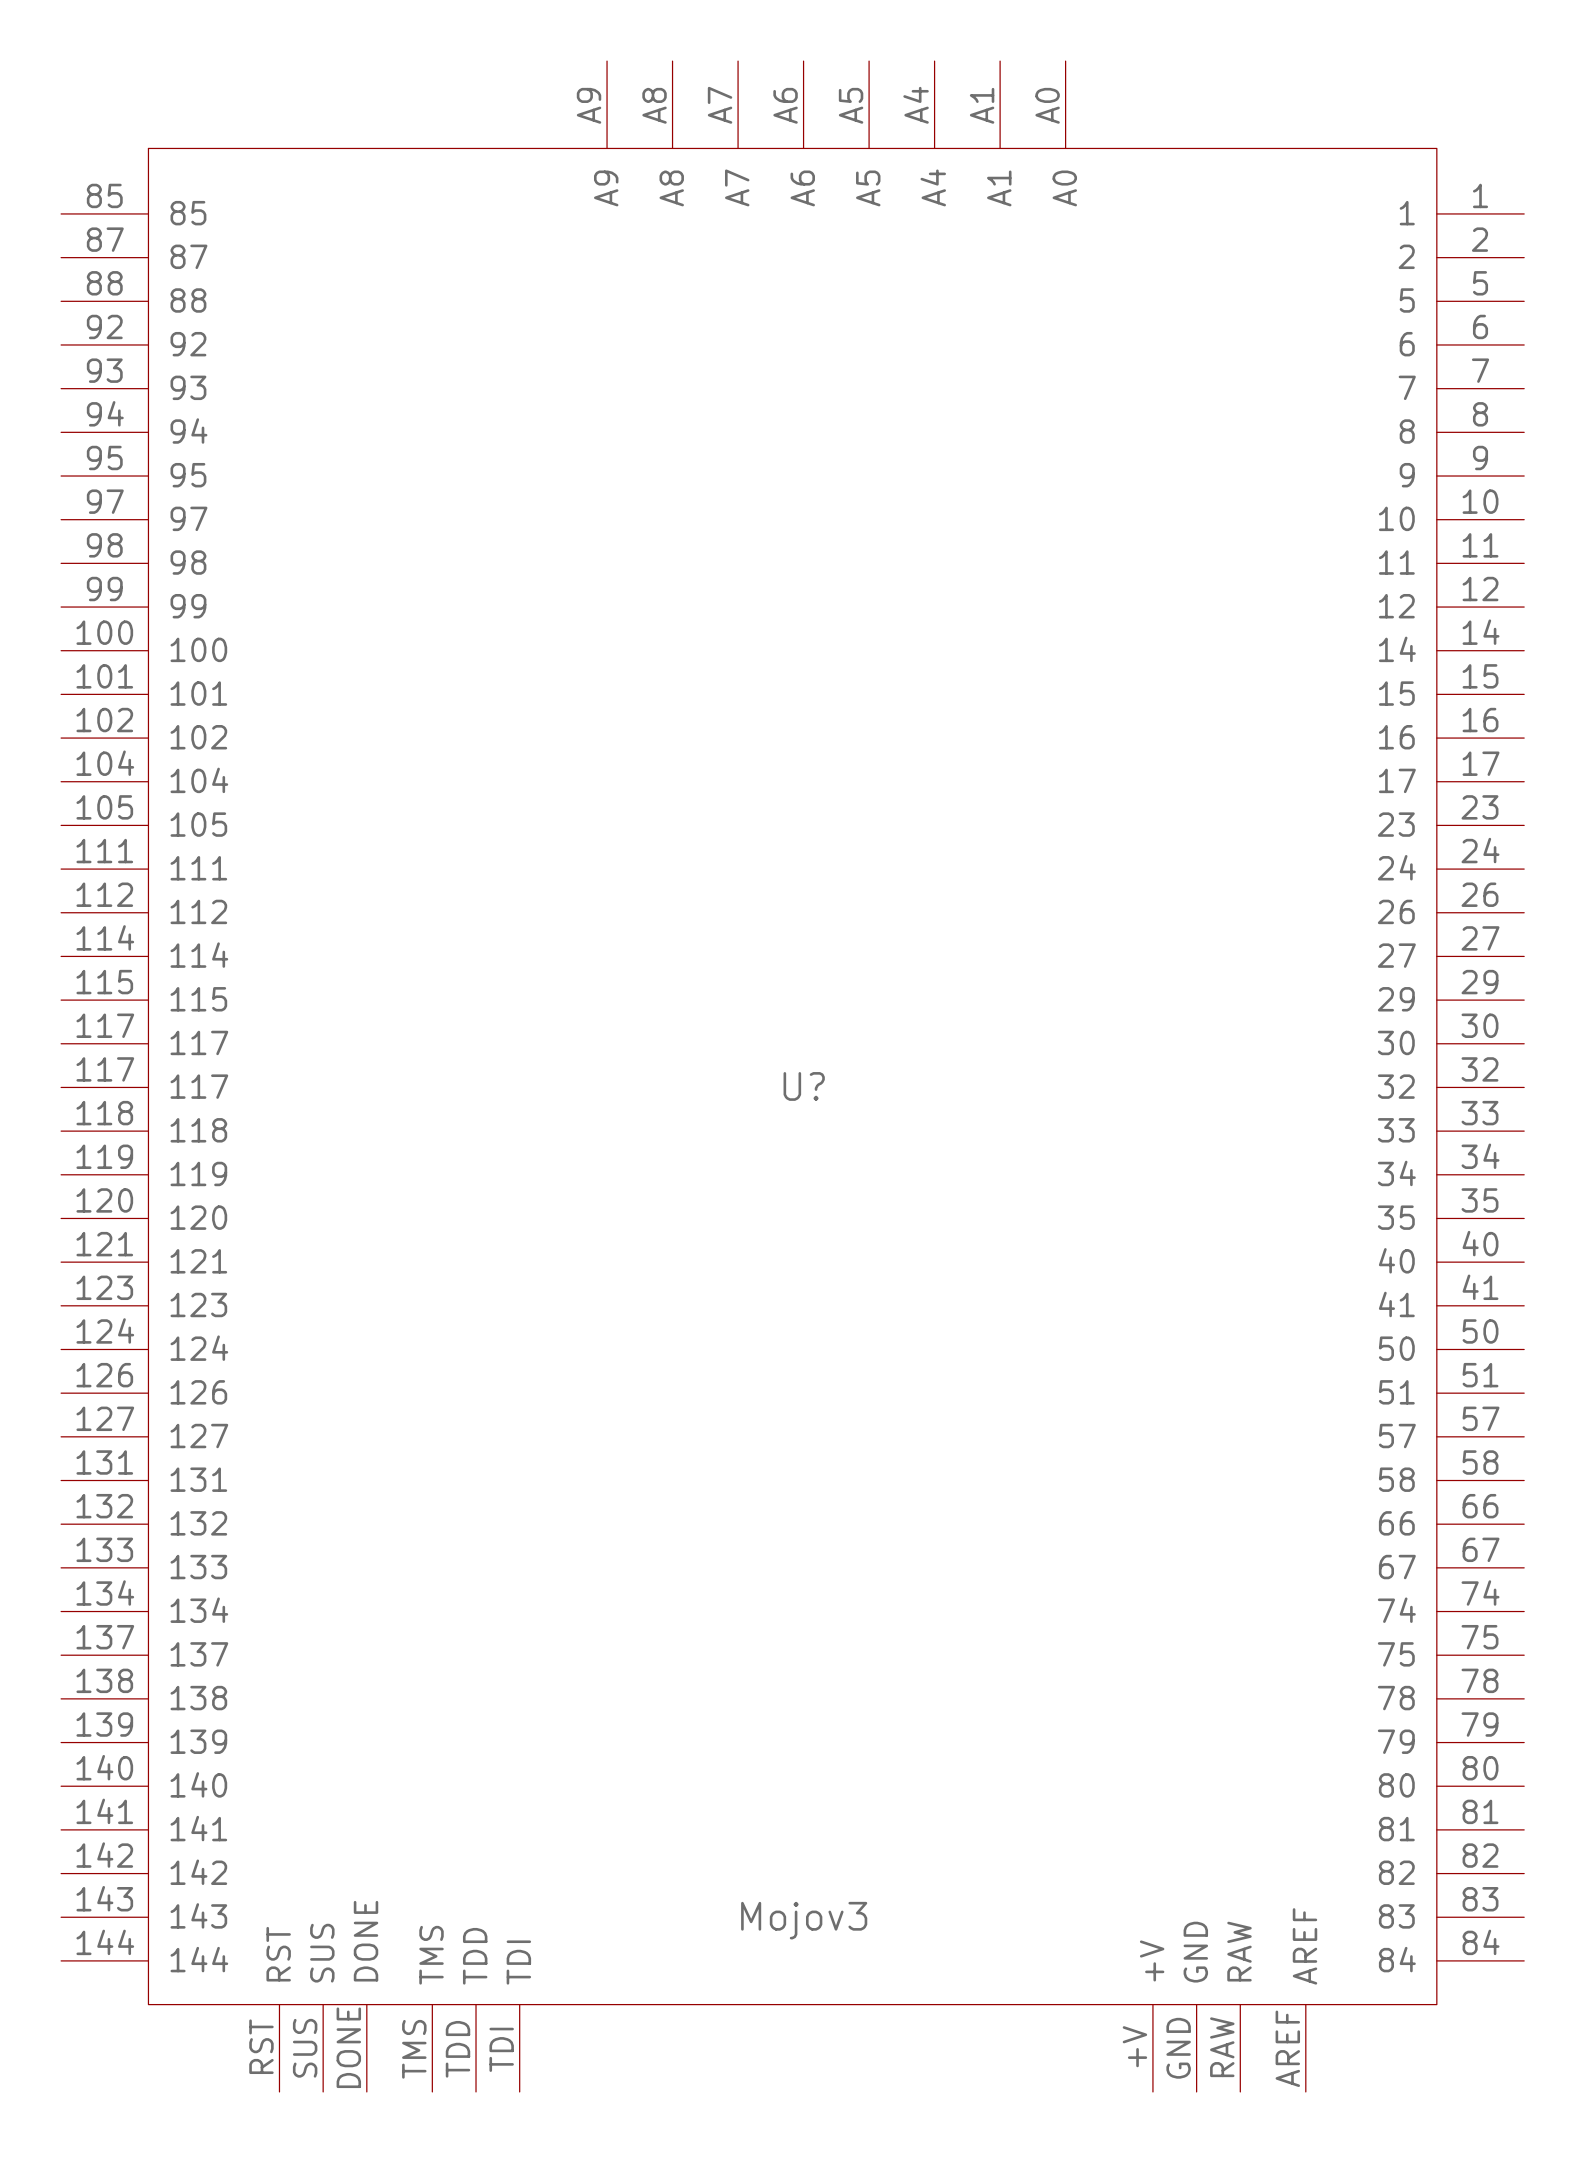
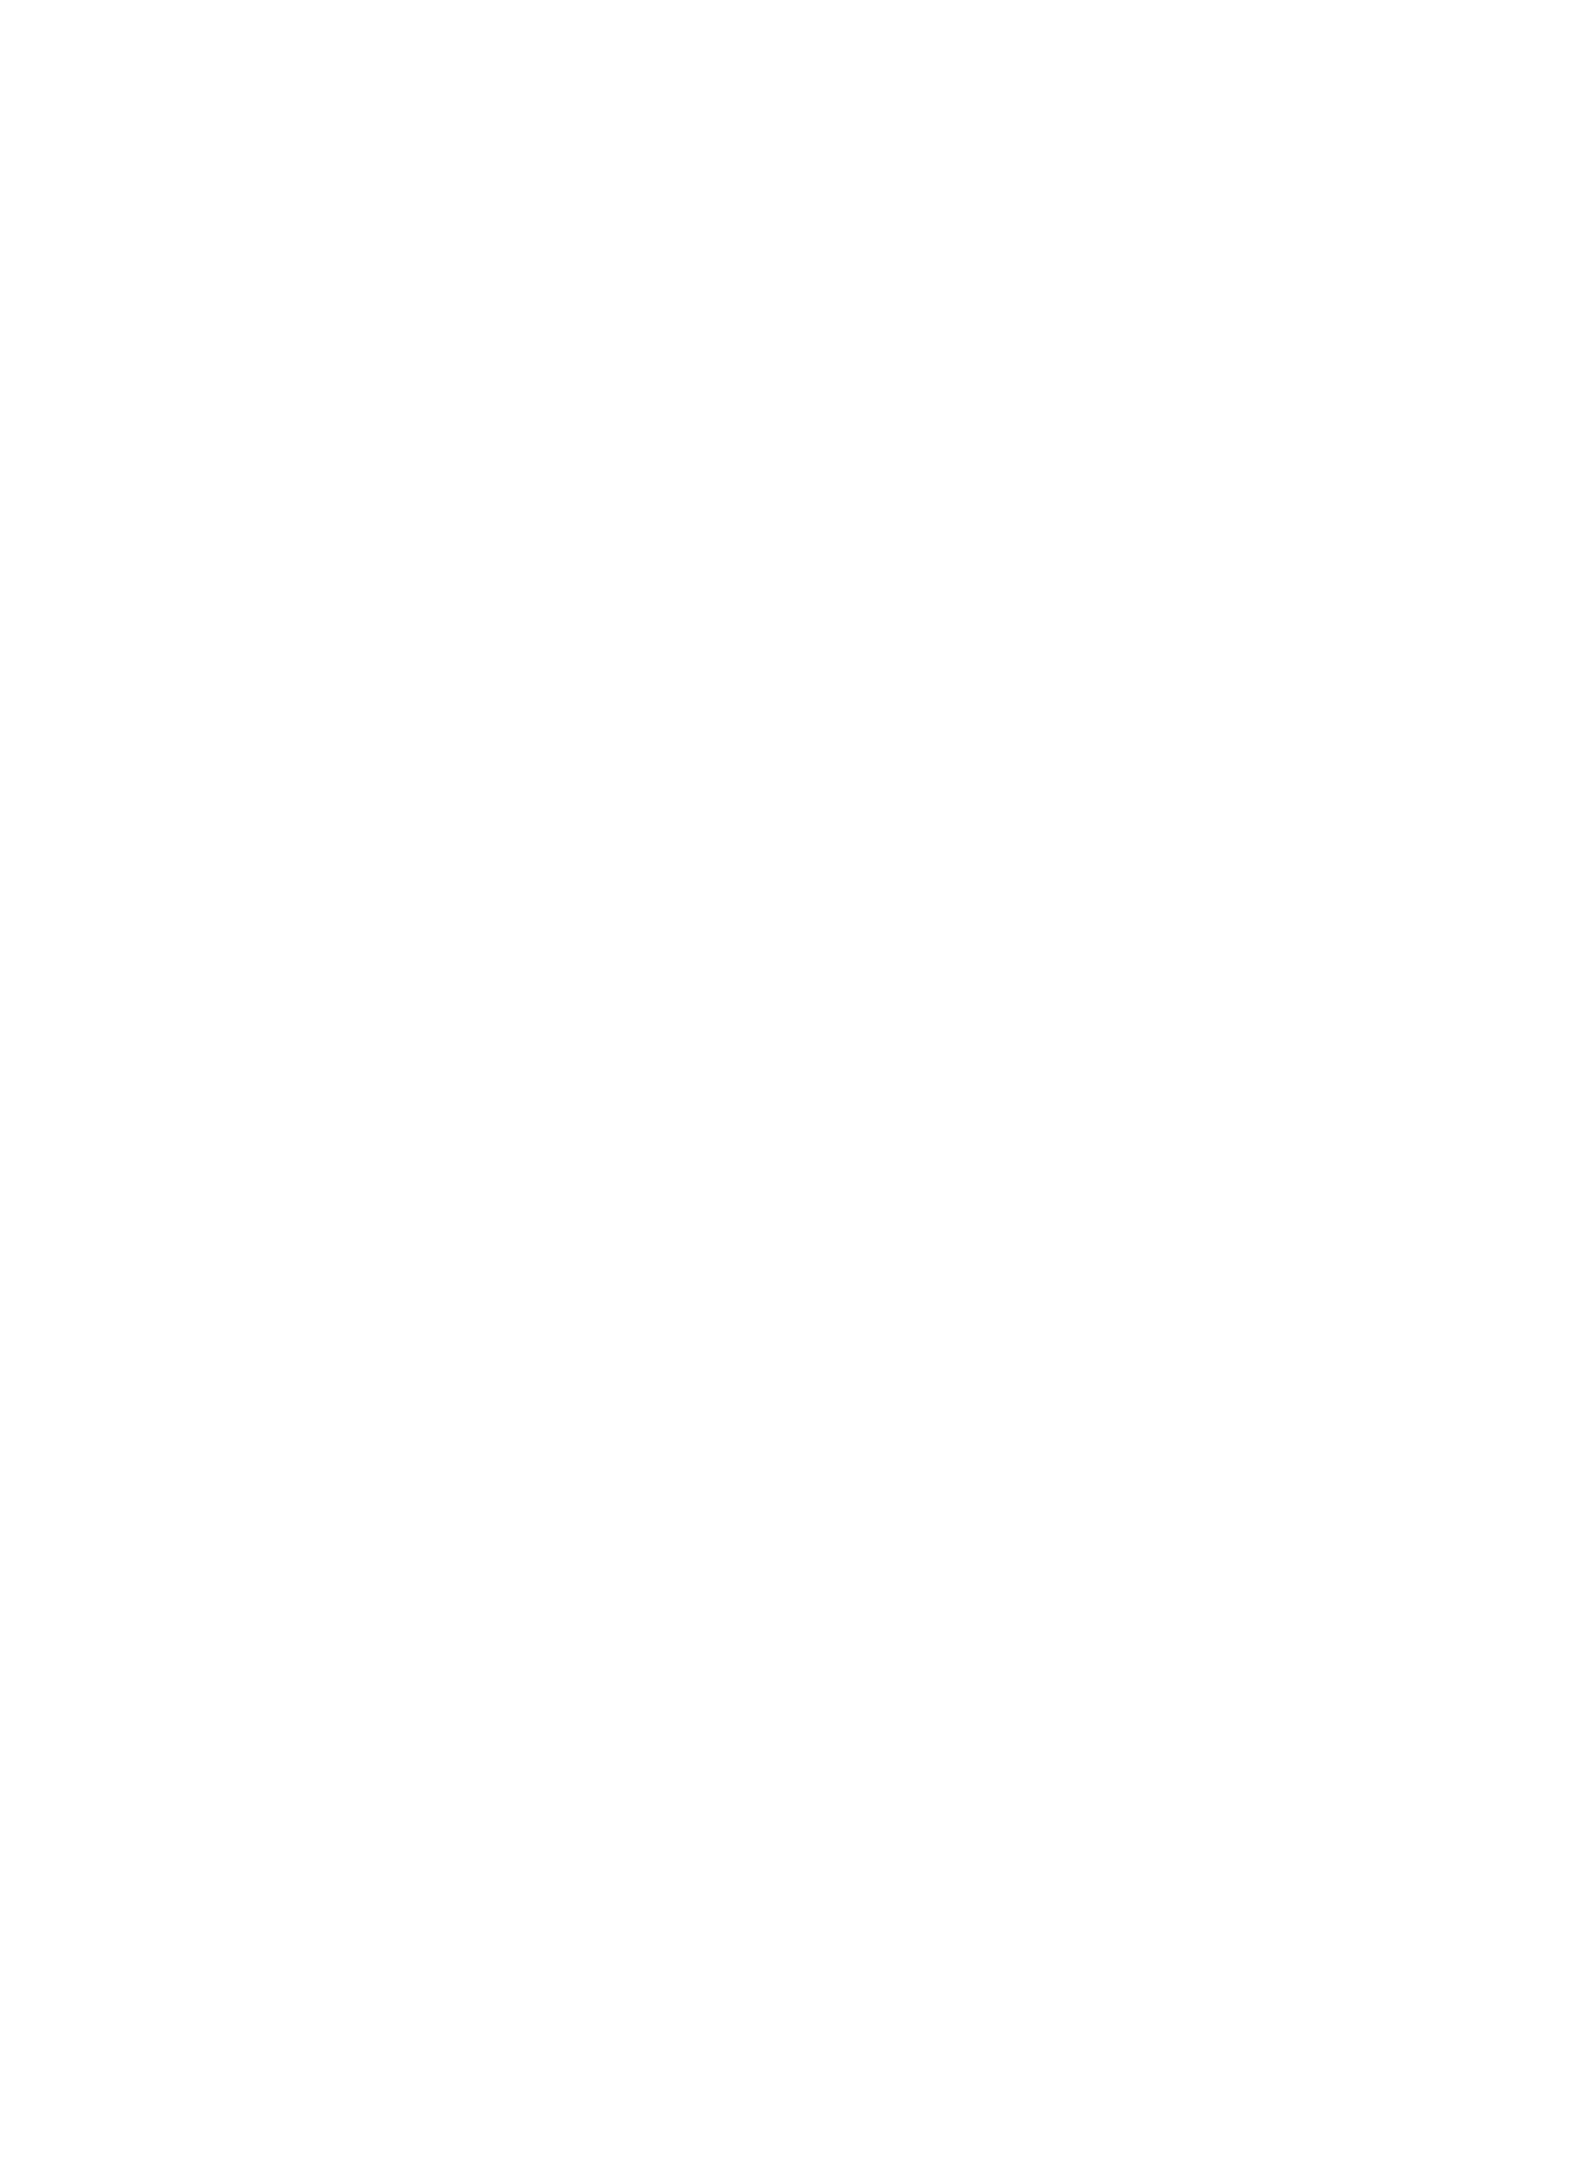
U?: Mojov3 (792, 1076) -> none

